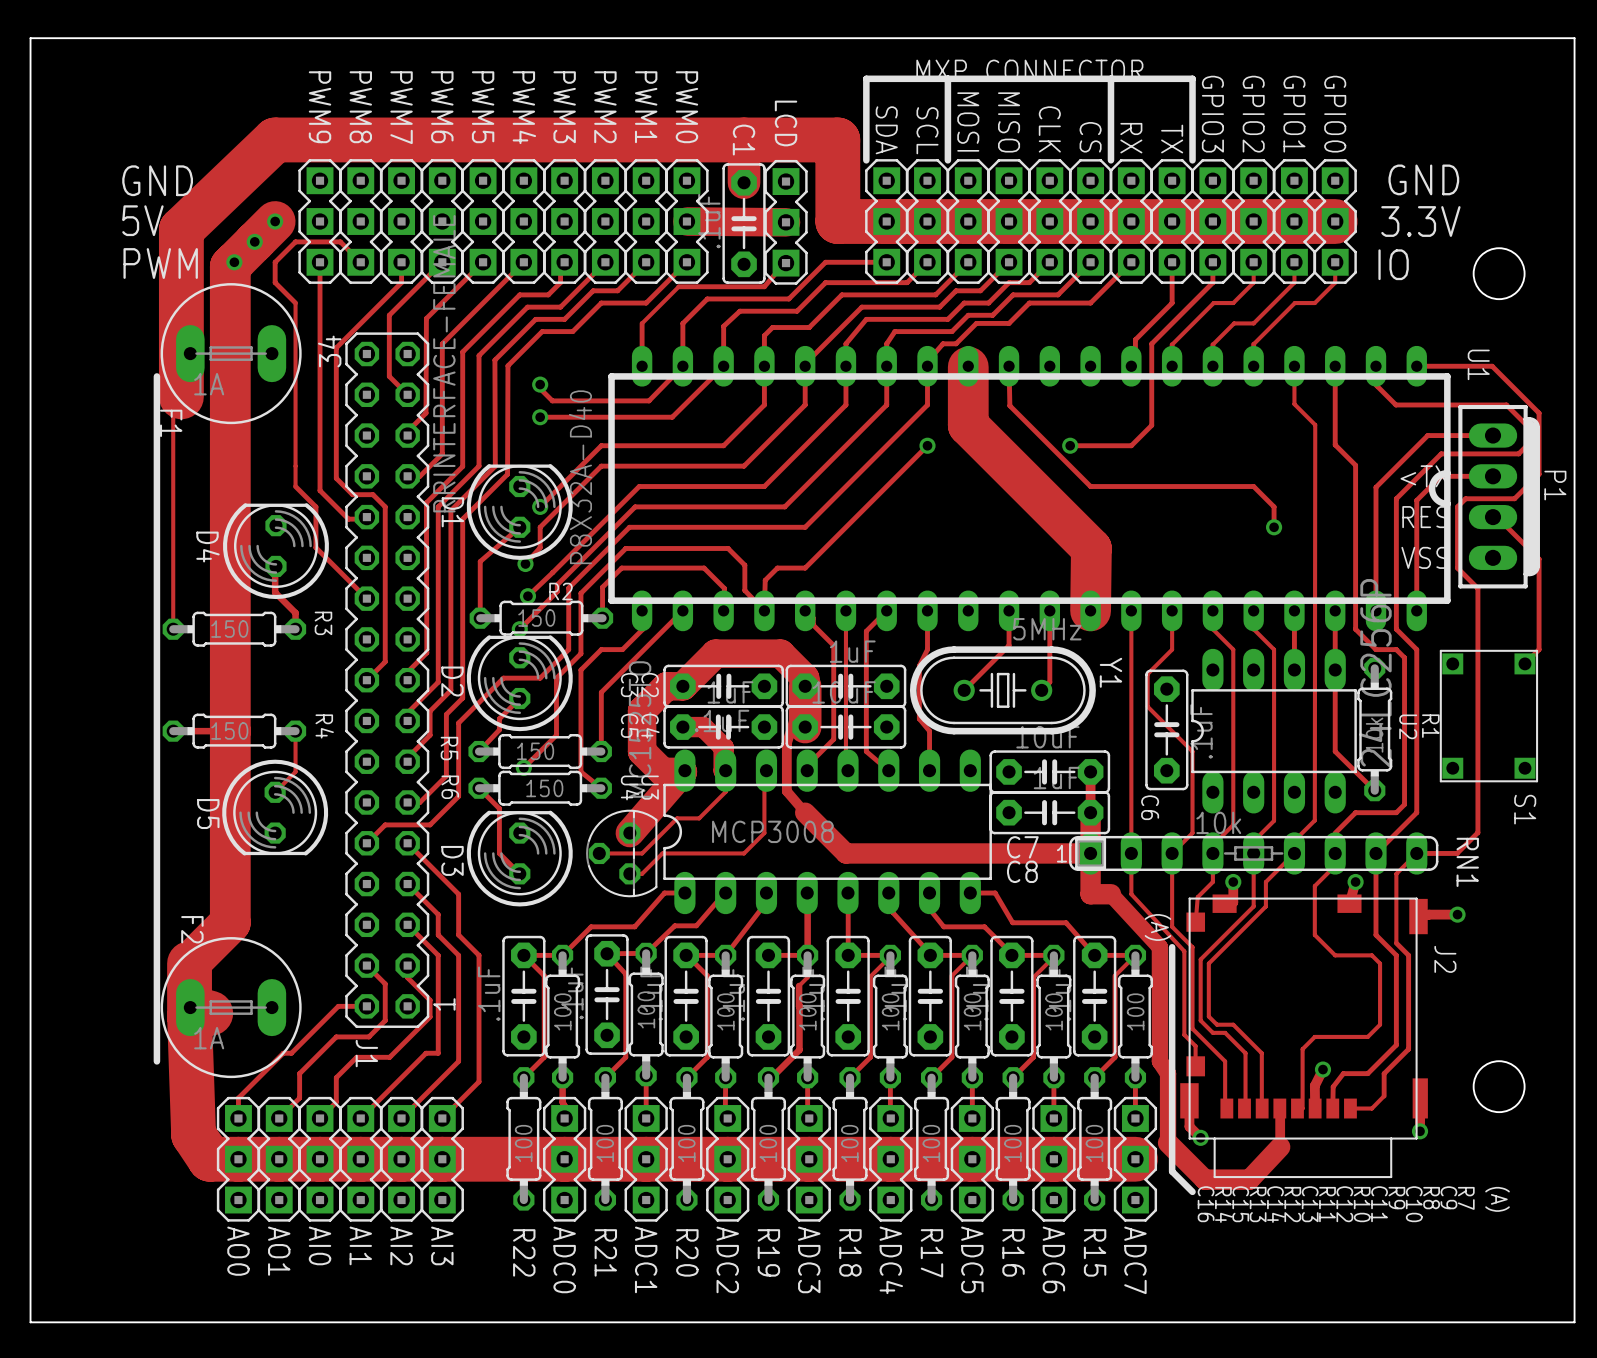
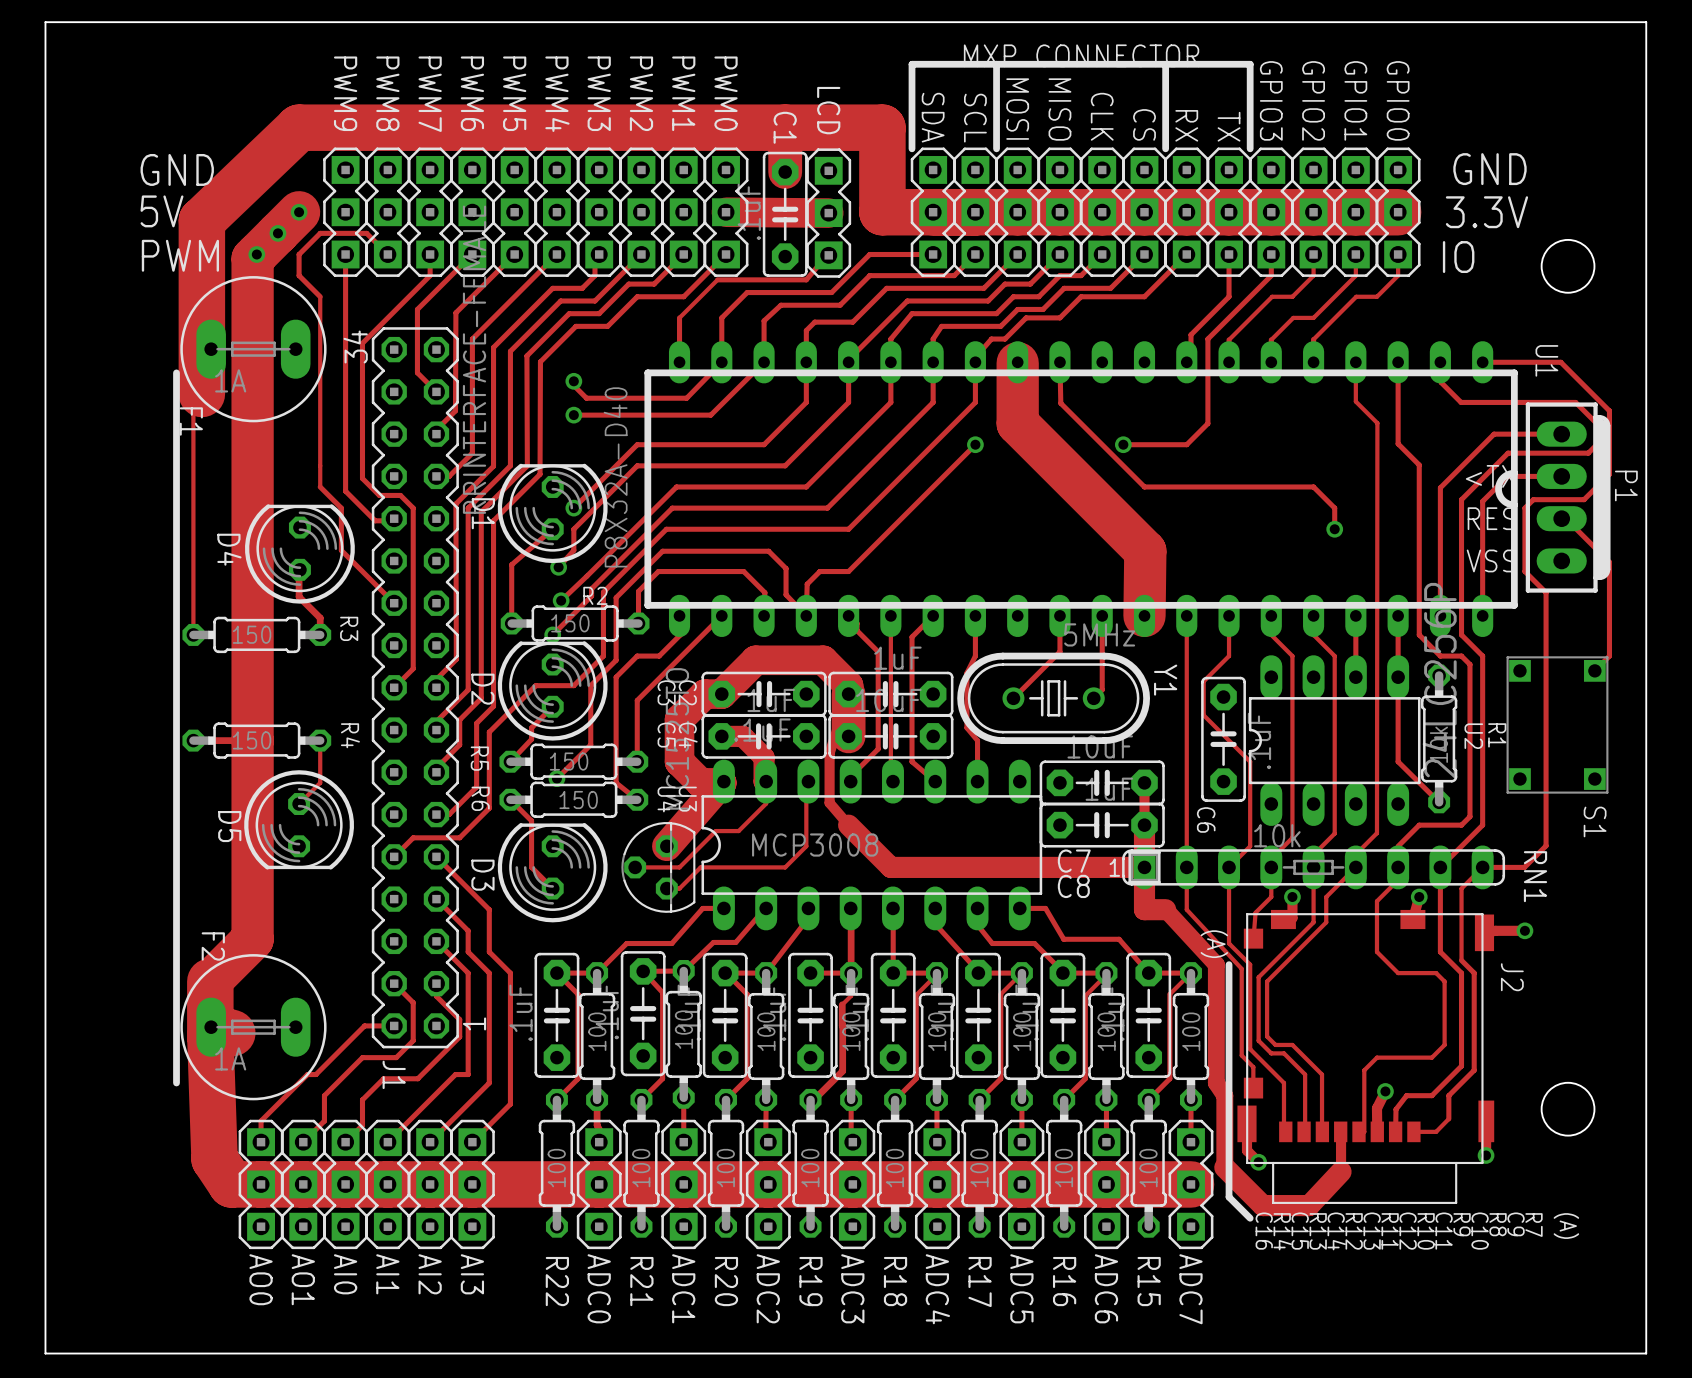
S1 footprint: [1439, 649, 1539, 783] -> [1506, 656, 1609, 794]

